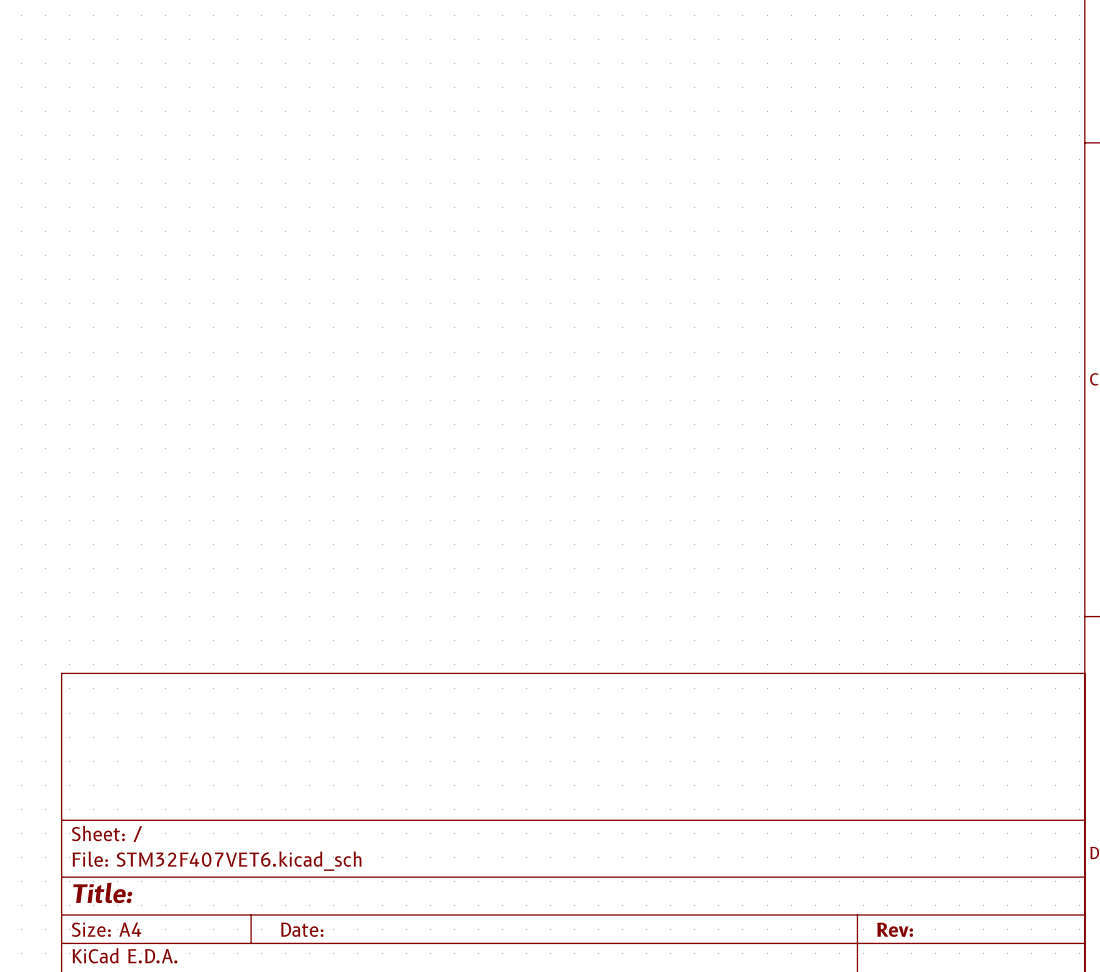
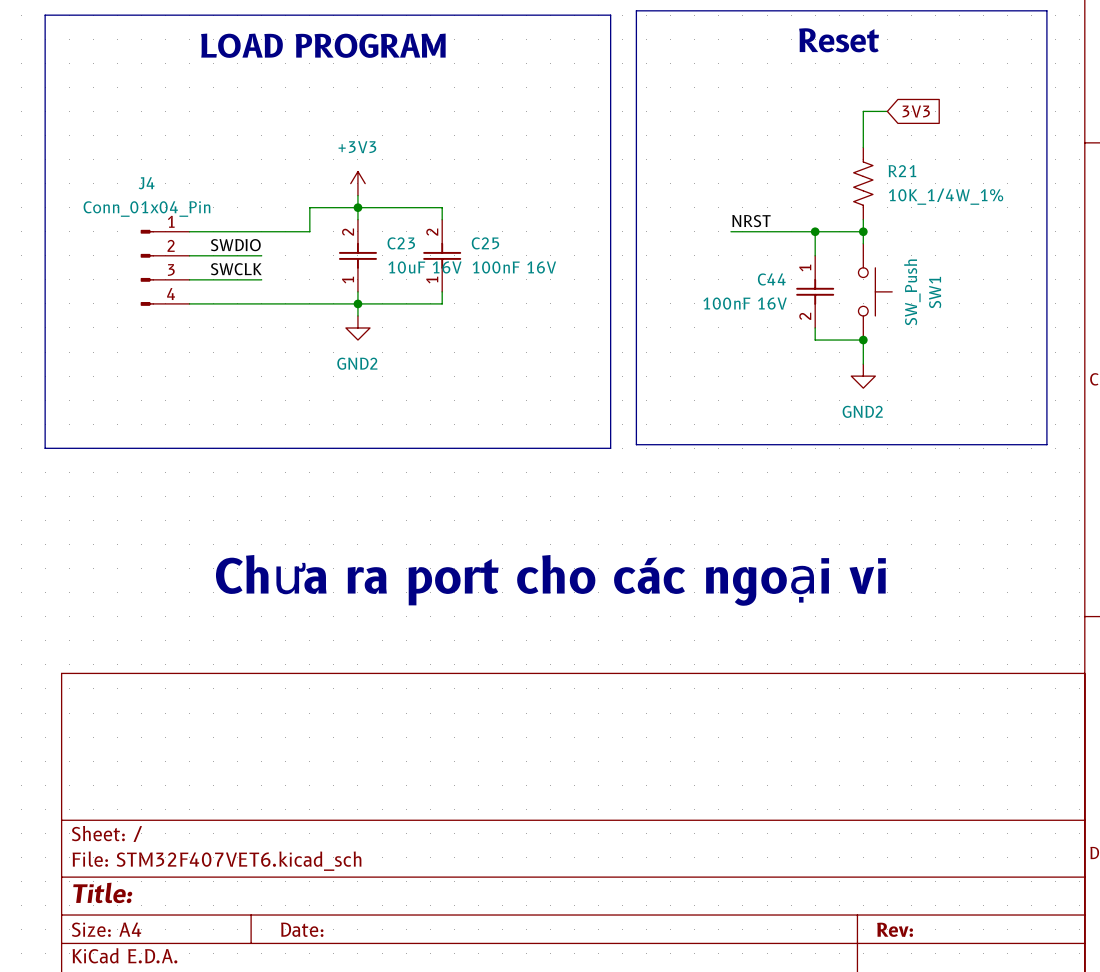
line: none -> (636, 10) (1046, 10) (1046, 444) (636, 444) (636, 10)
line: none -> (45, 15) (610, 15) (610, 448) (45, 448) (45, 15)
text: none -> Reset (839, 40)
text: none -> LOAD PROGRAM (323, 45)
wire: none -> (887, 111) (863, 111) (863, 147)
global label: none -> 3V3 (916, 111)
power symbol: none -> +3V3 (357, 183)
R21: none -> 10K_1/4W_1% (863, 183)
wire: none -> (357, 195) (357, 219)
junction: none -> (357, 207)
wire: none -> (442, 219) (442, 207) (309, 207) (309, 231) (189, 231)
wire: none -> (863, 219) (863, 243)
label: none -> NRST (751, 221)
wire: none -> (730, 231) (863, 231)
wire: none -> (815, 231) (815, 255)
junction: none -> (815, 231)
junction: none -> (863, 231)
label: none -> SWDIO (235, 245)
wire: none -> (189, 255) (261, 255)
C23: none -> 10uF 16V (357, 255)
C25: none -> 100nF 16V (442, 255)
J4: none -> Conn_01x04_Pin (165, 267)
label: none -> SWCLK (236, 269)
wire: none -> (189, 279) (261, 279)
wire: none -> (357, 291) (357, 315)
wire: none -> (442, 291) (442, 303) (189, 303)
C44: none -> 100nF 16V (815, 291)
SW1: none -> SW_Push (875, 291)
junction: none -> (357, 303)
power symbol: none -> GND2 (357, 327)
wire: none -> (815, 327) (815, 340) (863, 340) (863, 364)
junction: none -> (863, 340)
power symbol: none -> GND2 (863, 376)
text: none -> Chưa ra port cho các ngoại vi (550, 580)

